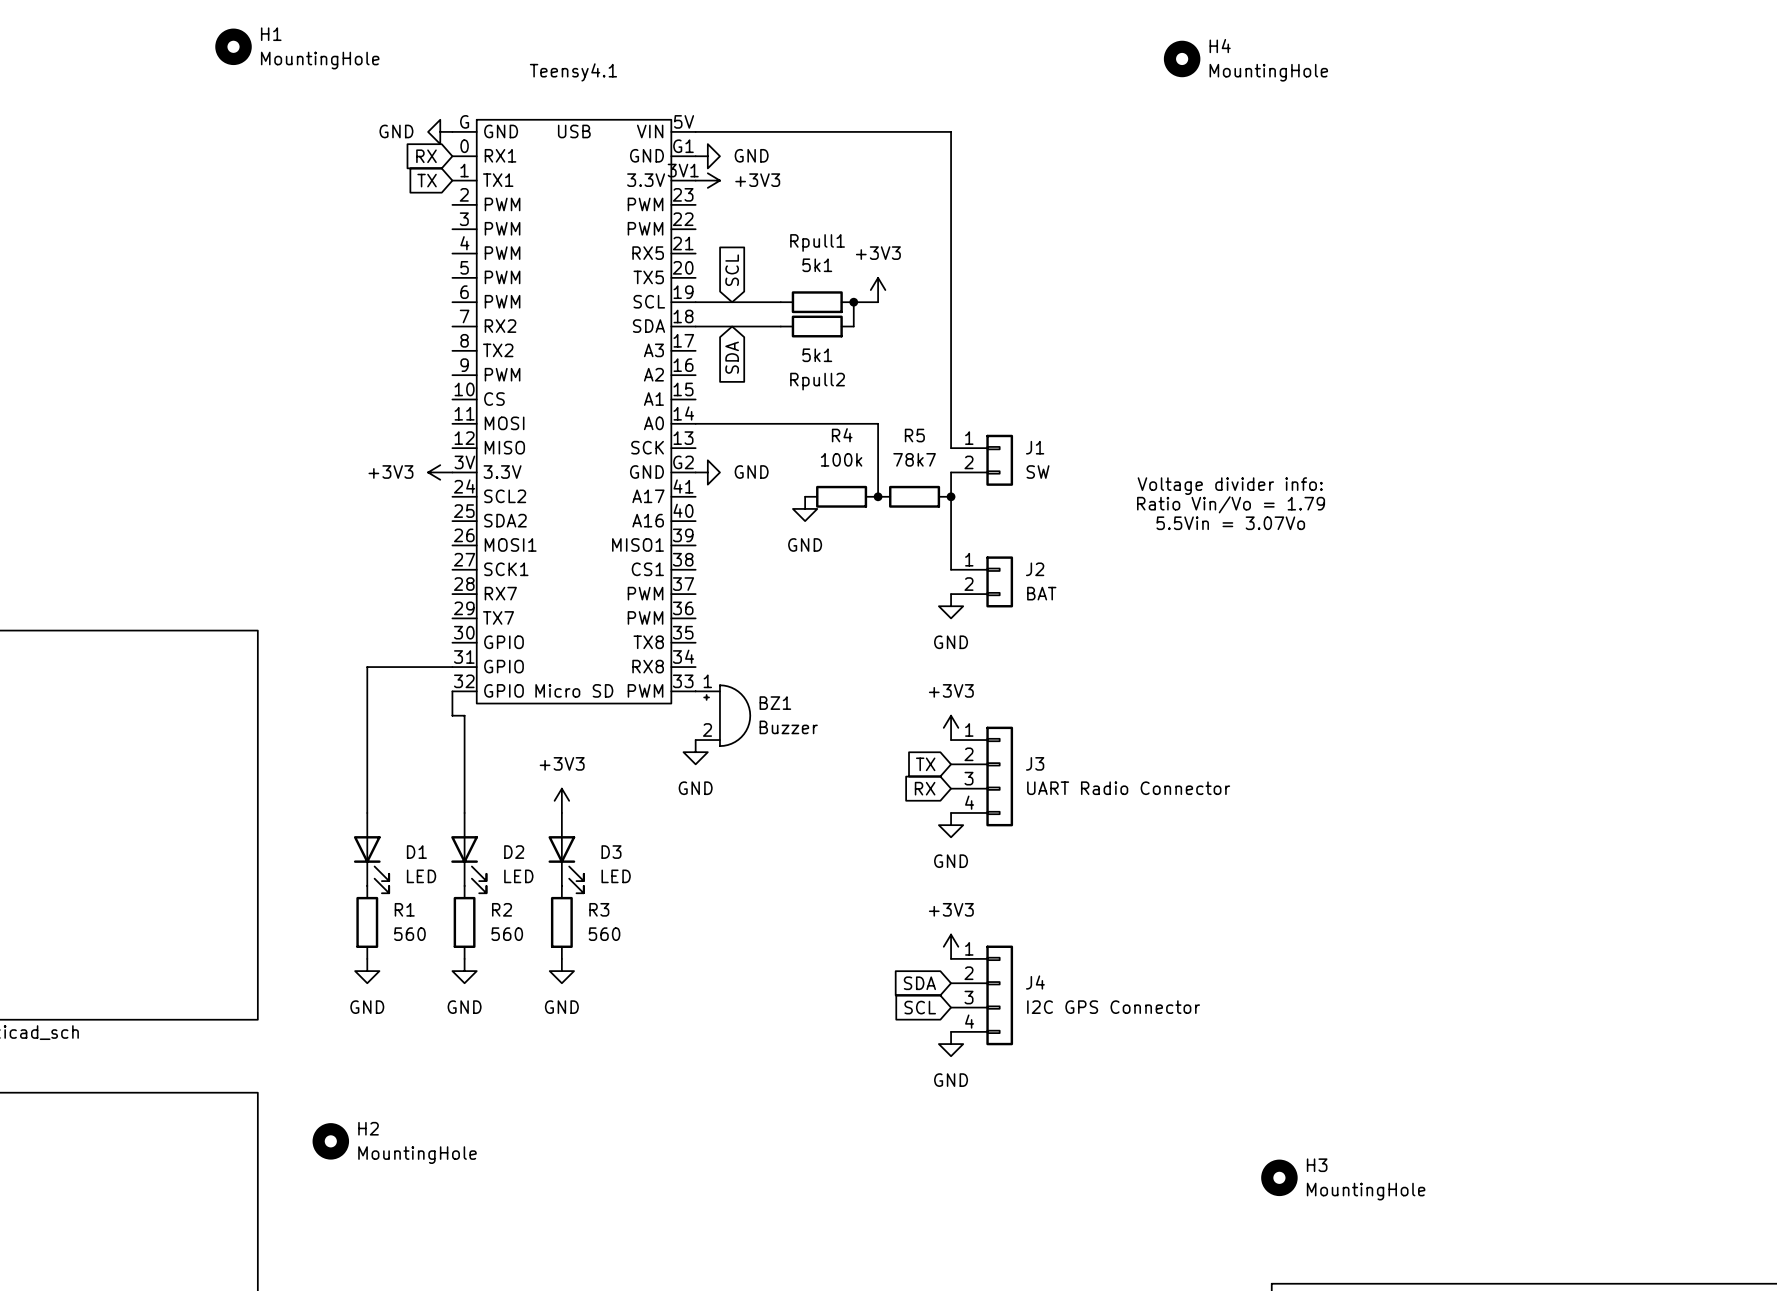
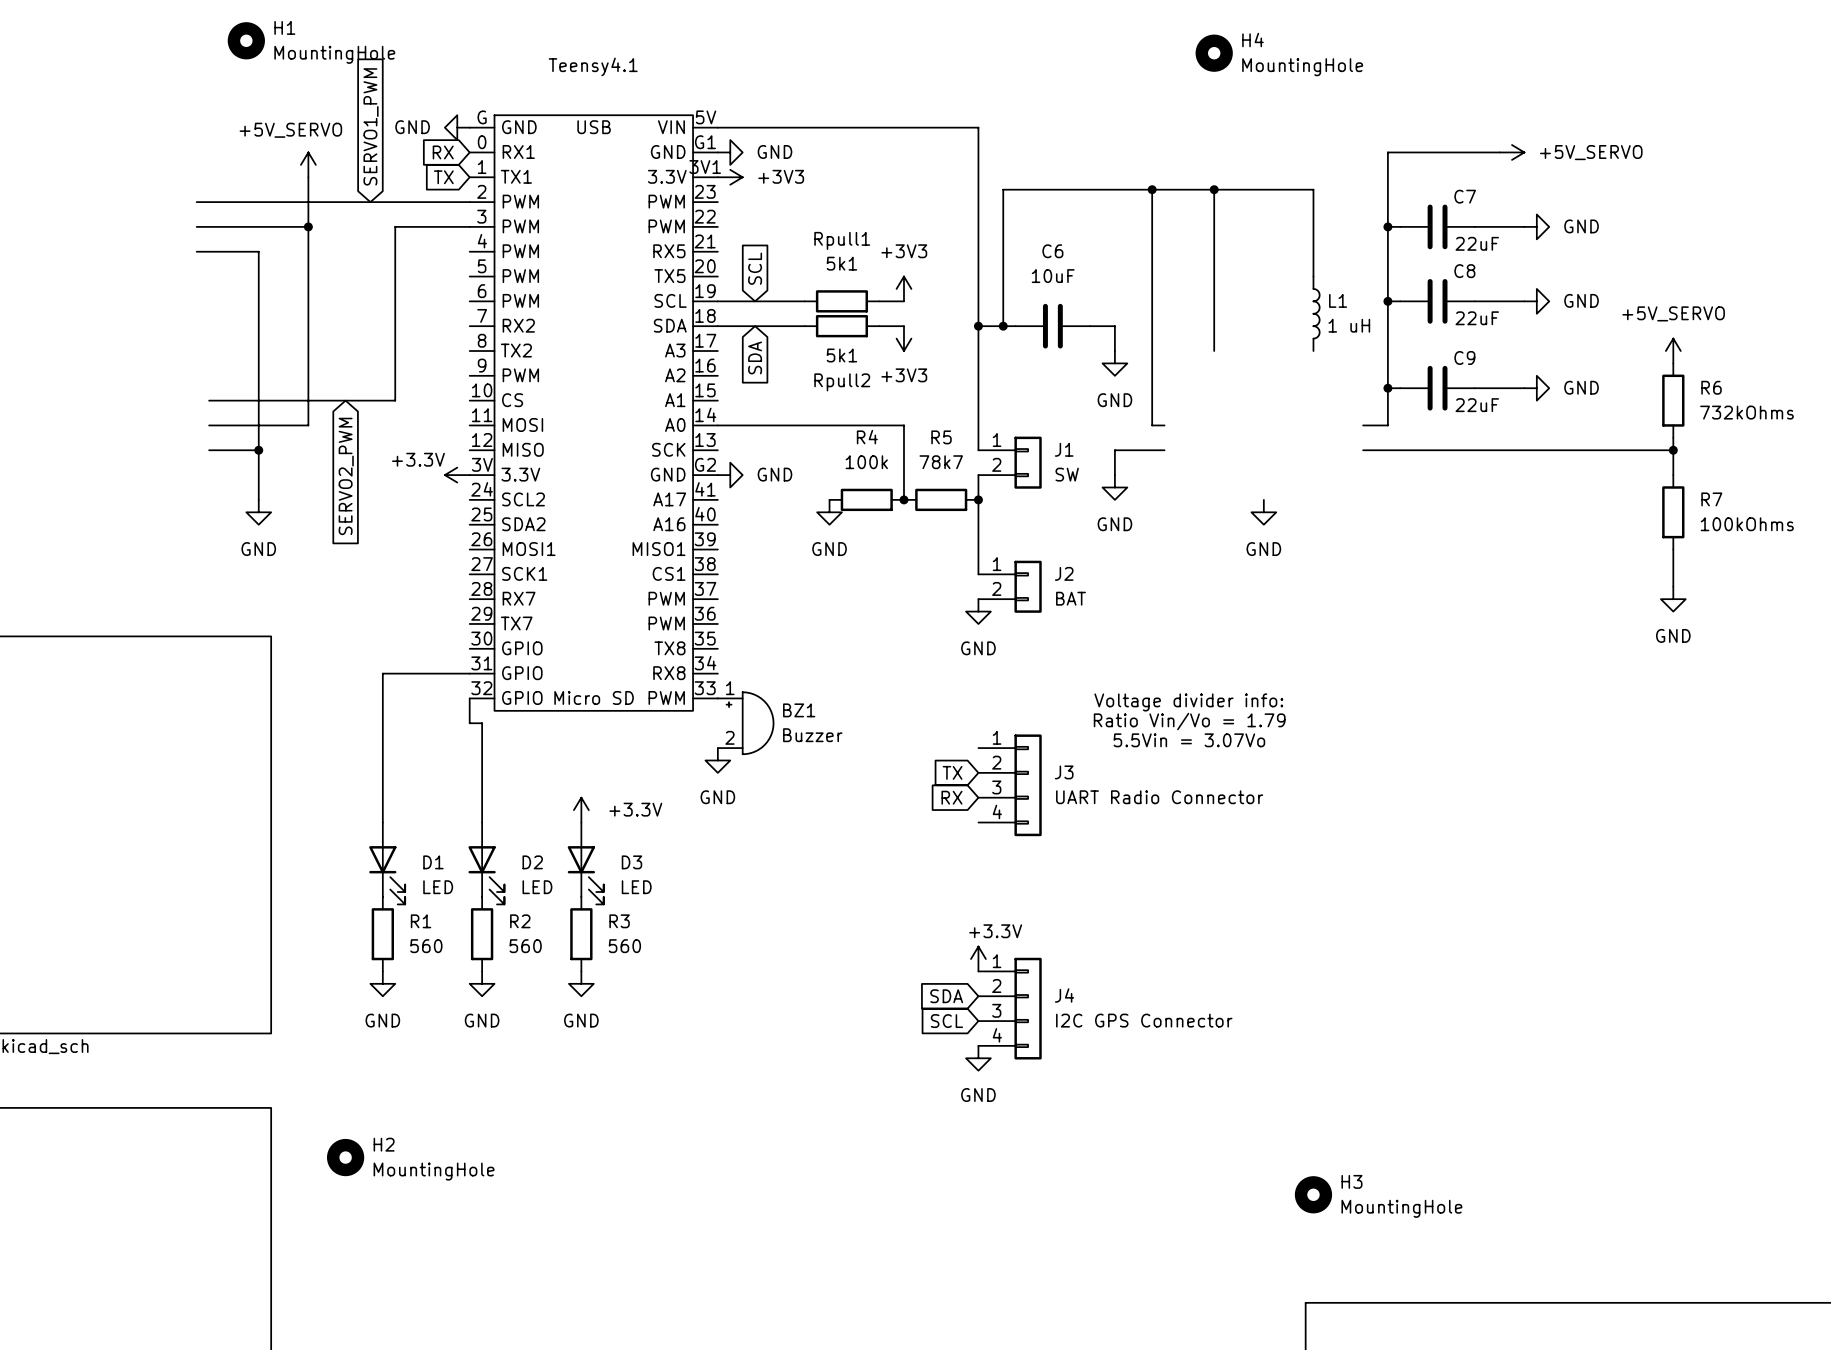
global label: none -> SERVO1_PWM (371, 126)
wire: none -> (1499, 152) (1387, 152) (1387, 425) (1363, 425)
power symbol: none -> +5V_SERVO (1512, 152)
power symbol: none -> +5V_SERVO (308, 164)
wire: none -> (308, 177) (308, 425) (209, 425)
wire: none -> (1152, 189) (1152, 425) (1164, 425)
junction: none -> (1152, 189)
wire: none -> (1214, 189) (1214, 351)
junction: none -> (1214, 189)
wire: none -> (196, 202) (469, 202)
wire: none -> (196, 226) (308, 226)
junction: none -> (308, 226)
wire: none -> (469, 226) (395, 226) (395, 400) (209, 400)
wire: none -> (1387, 226) (1400, 226)
junction: none -> (1387, 226)
C7: none -> 22uF (1437, 226)
wire: none -> (1474, 226) (1524, 226)
power symbol: none -> GND (1536, 226)
wire: none -> (196, 251) (258, 251) (258, 499)
wire: none -> (1313, 276) (1313, 189) (1003, 189) (1003, 326)
wire: (853, 302) (853, 326) -> (903, 326) (879, 326)
junction: (853, 302) -> none
wire: none -> (1387, 301) (1400, 301)
junction: none -> (1387, 301)
C8: none -> 22uF (1437, 301)
wire: none -> (1474, 301) (1524, 301)
power symbol: none -> GND (1536, 301)
L1: none -> 1 uH (1316, 313)
wire: none -> (978, 326) (1015, 326)
junction: none -> (978, 326)
junction: none -> (1003, 326)
C6: none -> 10uF (1052, 326)
wire: none -> (1090, 326) (1114, 326) (1114, 351)
power symbol: none -> +3V3 (903, 338)
power symbol: none -> +5V_SERVO (1673, 351)
power symbol: none -> GND (1114, 363)
wire: none -> (1387, 388) (1400, 388)
junction: none -> (1387, 388)
C9: none -> 22uF (1437, 388)
wire: none -> (1474, 388) (1524, 388)
power symbol: none -> GND (1536, 388)
R6: none -> 732kOhms (1673, 400)
wire: none -> (1673, 437) (1673, 475)
wire: none -> (209, 450) (258, 450)
junction: none -> (258, 450)
wire: none -> (1164, 450) (1114, 450) (1114, 475)
wire: none -> (1363, 450) (1673, 450)
junction: none -> (1673, 450)
power symbol: +3V3 (440, 472) -> +3.3V (457, 475)
global label: none -> SERVO2_PWM (346, 476)
power symbol: none -> GND (1114, 487)
text position: Voltage divider info: (1230, 486) -> Voltage divider info: (1188, 702)
text position: Ratio Vin/Vo = 1.79 (1231, 504) -> Ratio Vin/Vo = 1.79 (1189, 721)
power symbol: none -> GND (258, 512)
power symbol: none -> GND (1263, 512)
R7: none -> 100kOhms (1673, 512)
text position: 5.5Vin = 3.07Vo (1230, 523) -> 5.5Vin = 3.07Vo (1189, 740)
wire: none -> (1673, 549) (1673, 586)
power symbol: none -> GND (1673, 599)
power symbol: +3V3 (951, 727) -> none
power symbol: +3V3 (561, 800) -> +3.3V (581, 810)
power symbol: GND (951, 825) -> none
power symbol: +3V3 (951, 946) -> +3.3V (978, 959)

